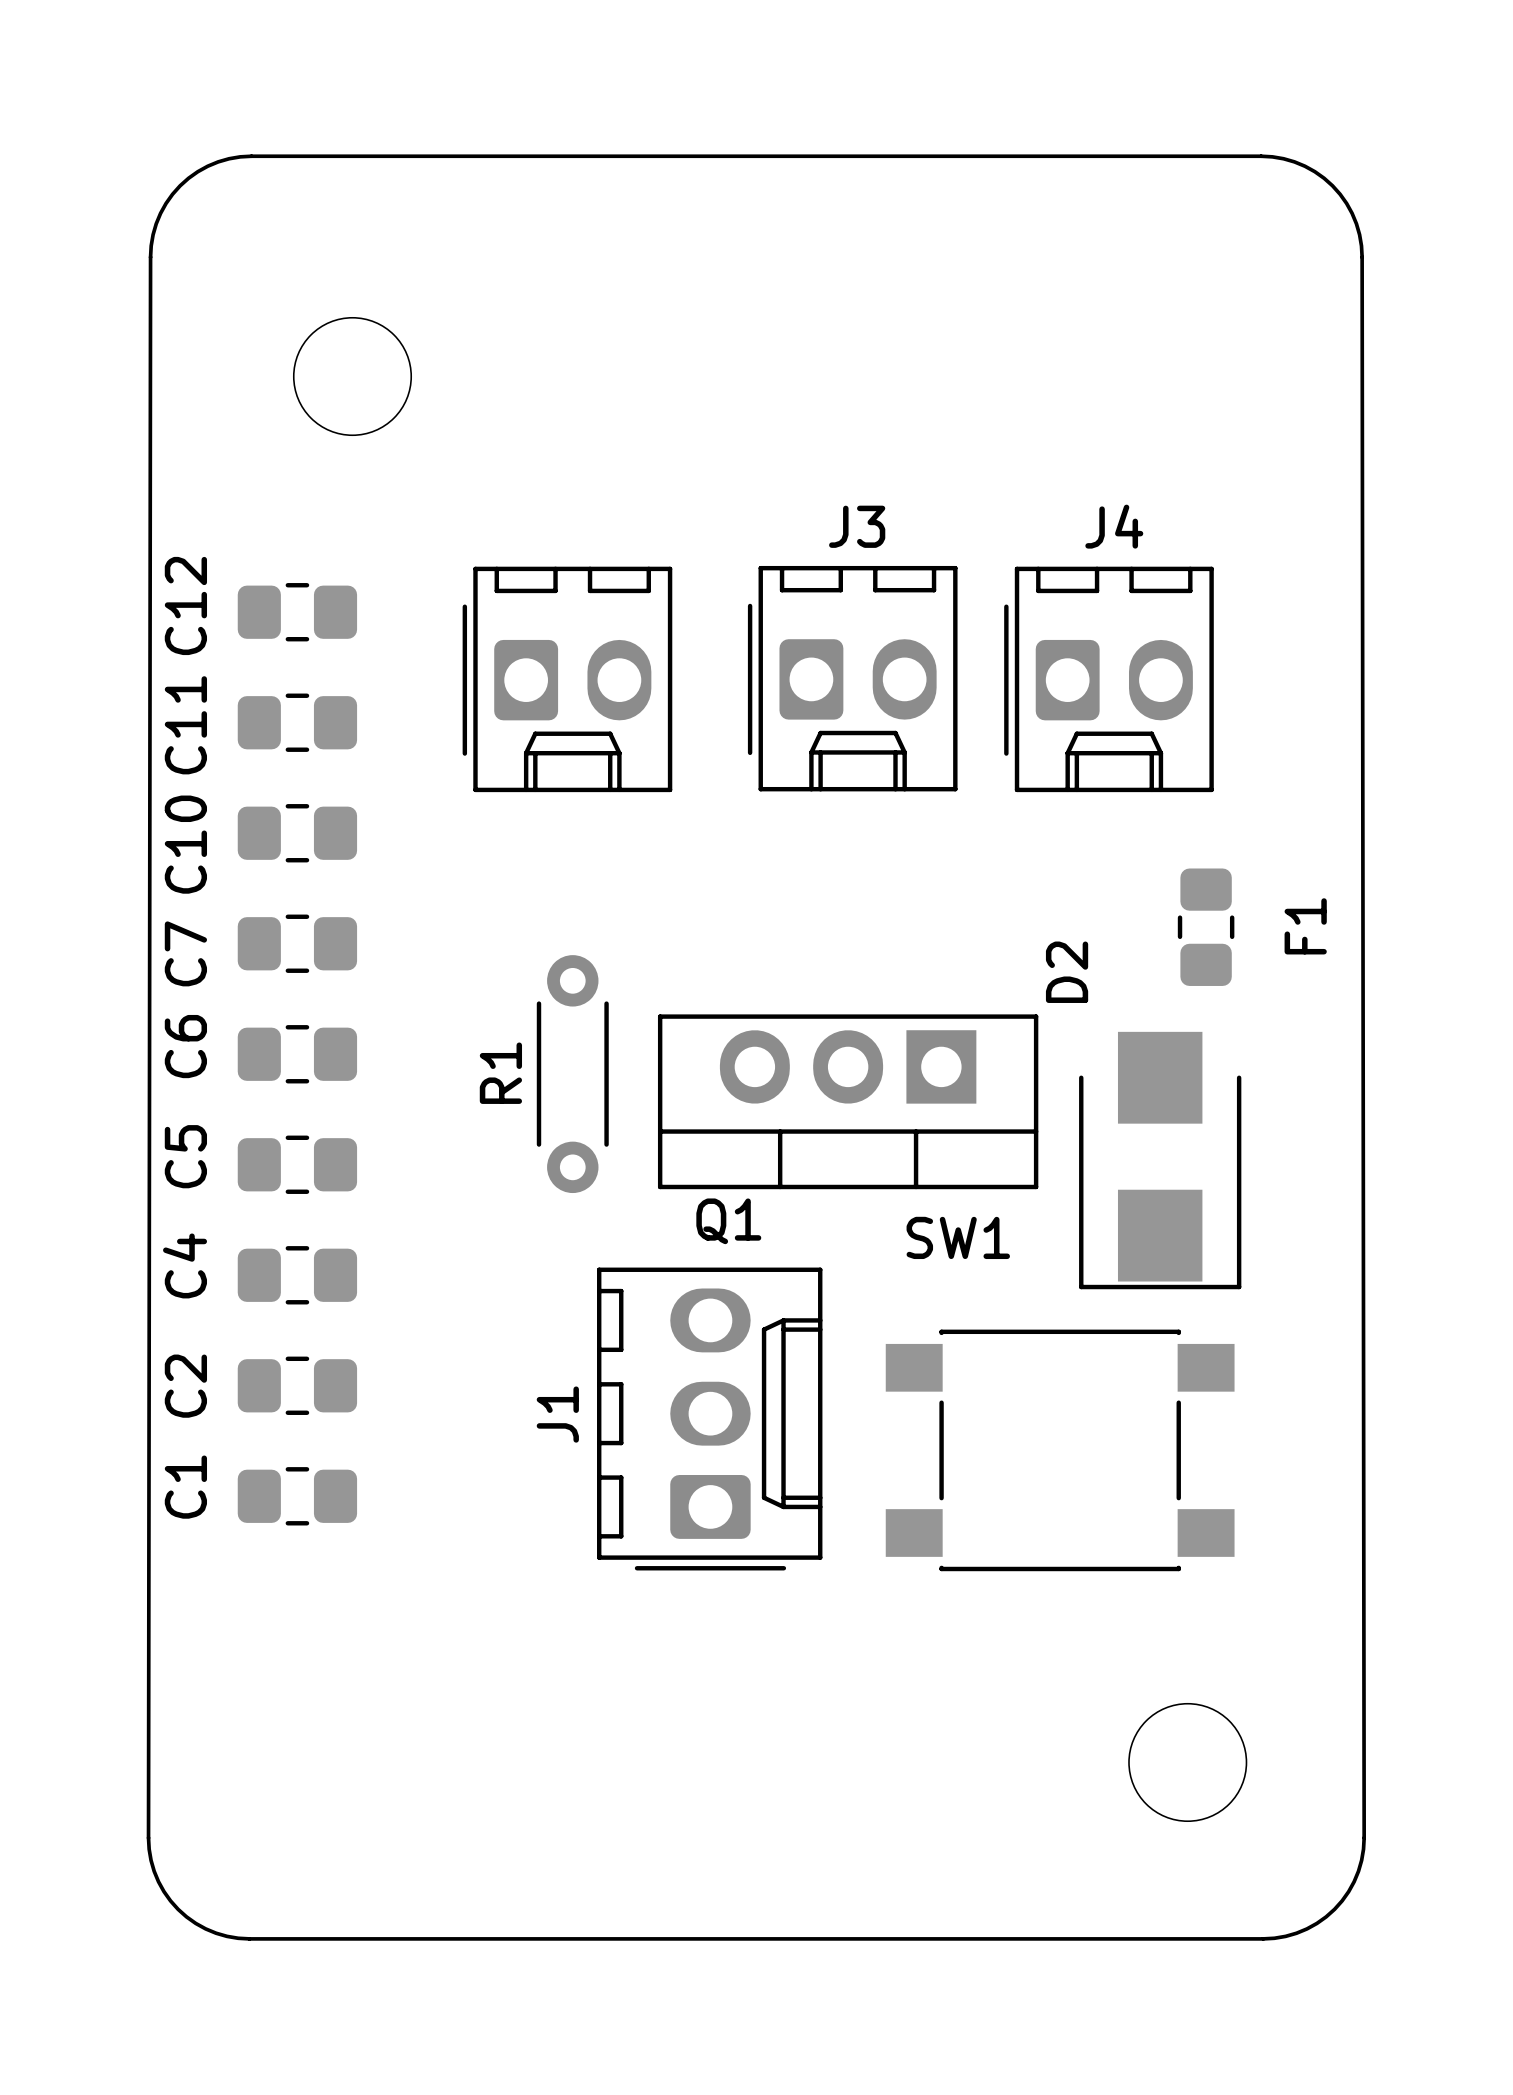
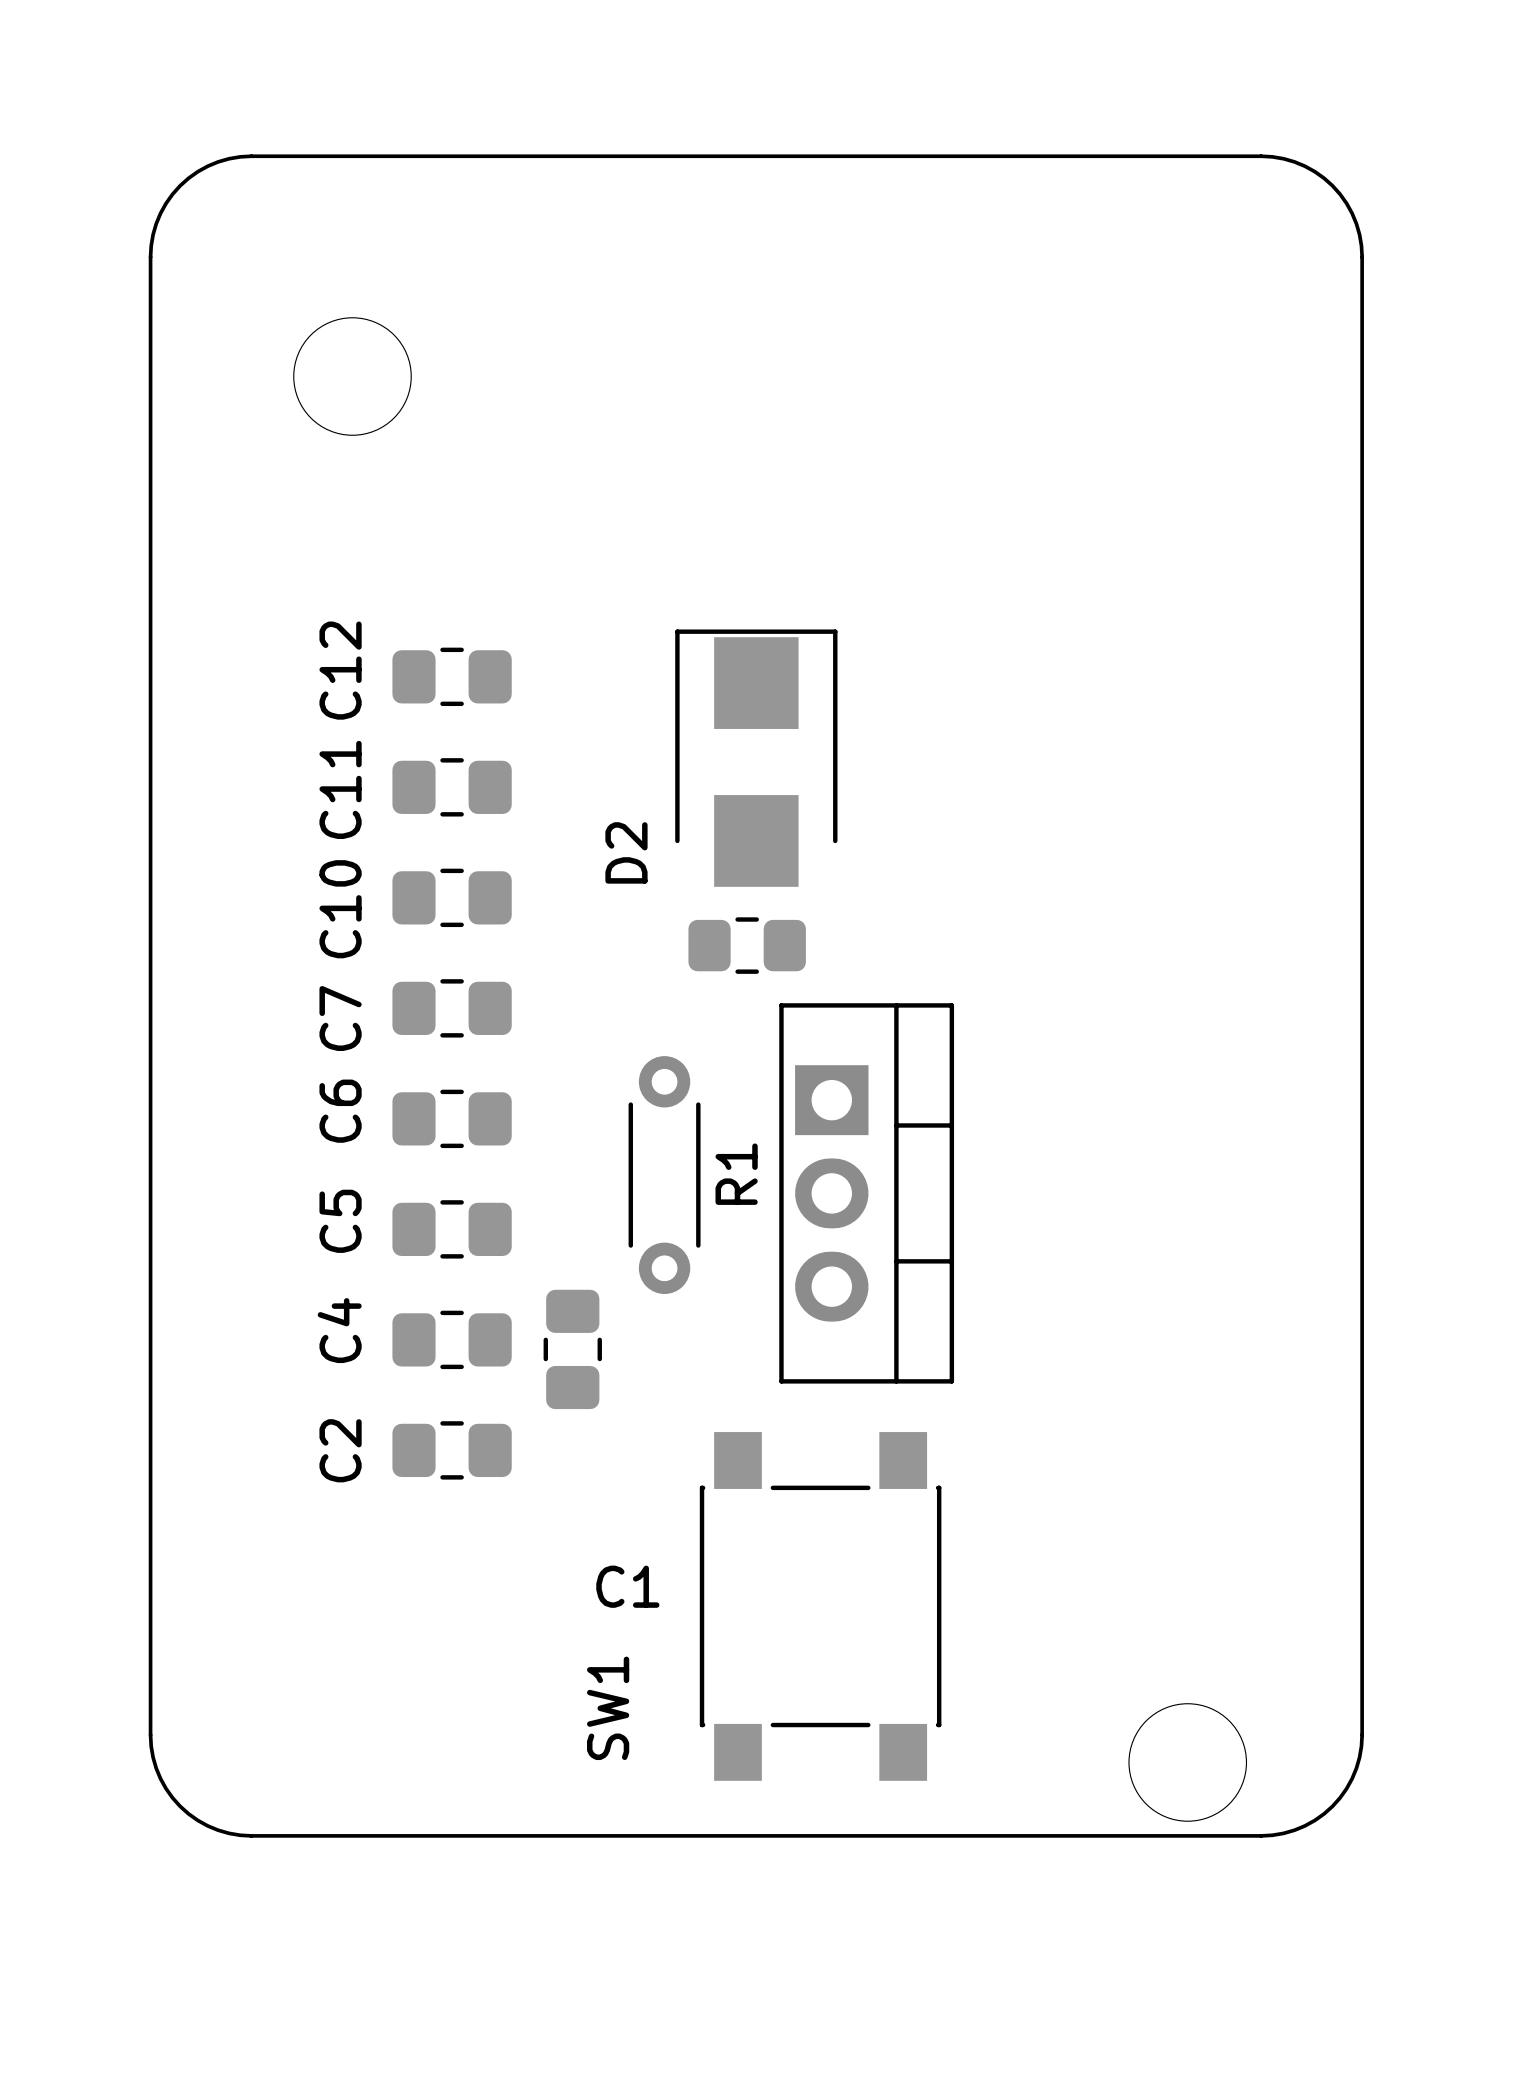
board edge: (150, 257) (149, 1849) (158, 1881) (178, 1909) (195, 1923) (216, 1933) (249, 1938) (1263, 1938) (1296, 1933) (1316, 1923) (1334, 1909) (1348, 1891) (1361, 1860) (1364, 1837) (1362, 257) -> (150, 257) (151, 1746) (156, 1768) (166, 1788) (188, 1813) (218, 1830) (251, 1835) (1261, 1835) (1294, 1830) (1314, 1820) (1332, 1806) (1346, 1788) (1359, 1757) (1362, 1734) (1362, 257)
C12 position: (297, 612) -> (452, 676)
J3: (852, 678) -> none
part: (567, 679) -> none
J4: (1108, 679) -> none
C11 position: (297, 722) -> (452, 787)
C10 position: (297, 833) -> (452, 897)
F1: (1206, 927) -> none
C7 position: (297, 943) -> (452, 1008)
part: none -> (747, 945)
D2 name position: D2 (1067, 972) -> D2 (626, 852)
C6 position: (297, 1054) -> (452, 1118)
R1 name position: R1 (500, 1073) -> R1 (736, 1174)
R1 position: (572, 1074) -> (664, 1175)
Q1: (848, 1101) -> none
D2 rotation: 0° (1160, 1160) -> 180° (756, 758)
D2 position: (1160, 1160) -> (756, 758)
C5 position: (297, 1164) -> (452, 1229)
part: none -> (866, 1193)
SW1 name position: SW1 (958, 1237) -> SW1 (608, 1708)
C4 position: (297, 1275) -> (452, 1339)
C2 position: (297, 1385) -> (452, 1450)
J1: (709, 1419) -> none
SW1 rotation: 0° (1060, 1450) -> 90° clockwise (820, 1606)
SW1 position: (1060, 1450) -> (820, 1606)
C1 name position: C1 (185, 1487) -> C1 (627, 1586)
C1 rotation: 0° (297, 1496) -> 90° clockwise (572, 1349)
C1 position: (297, 1496) -> (572, 1349)

